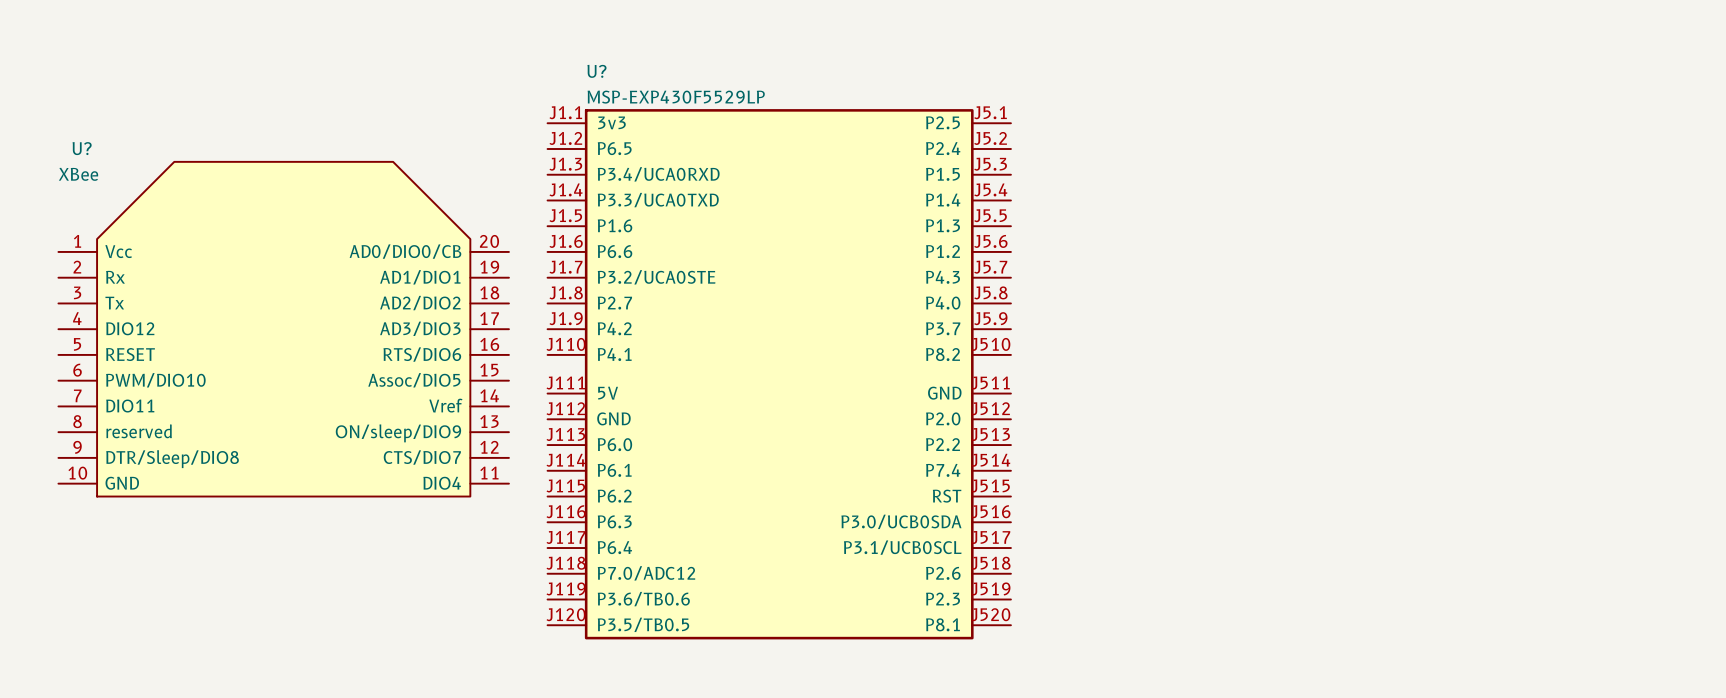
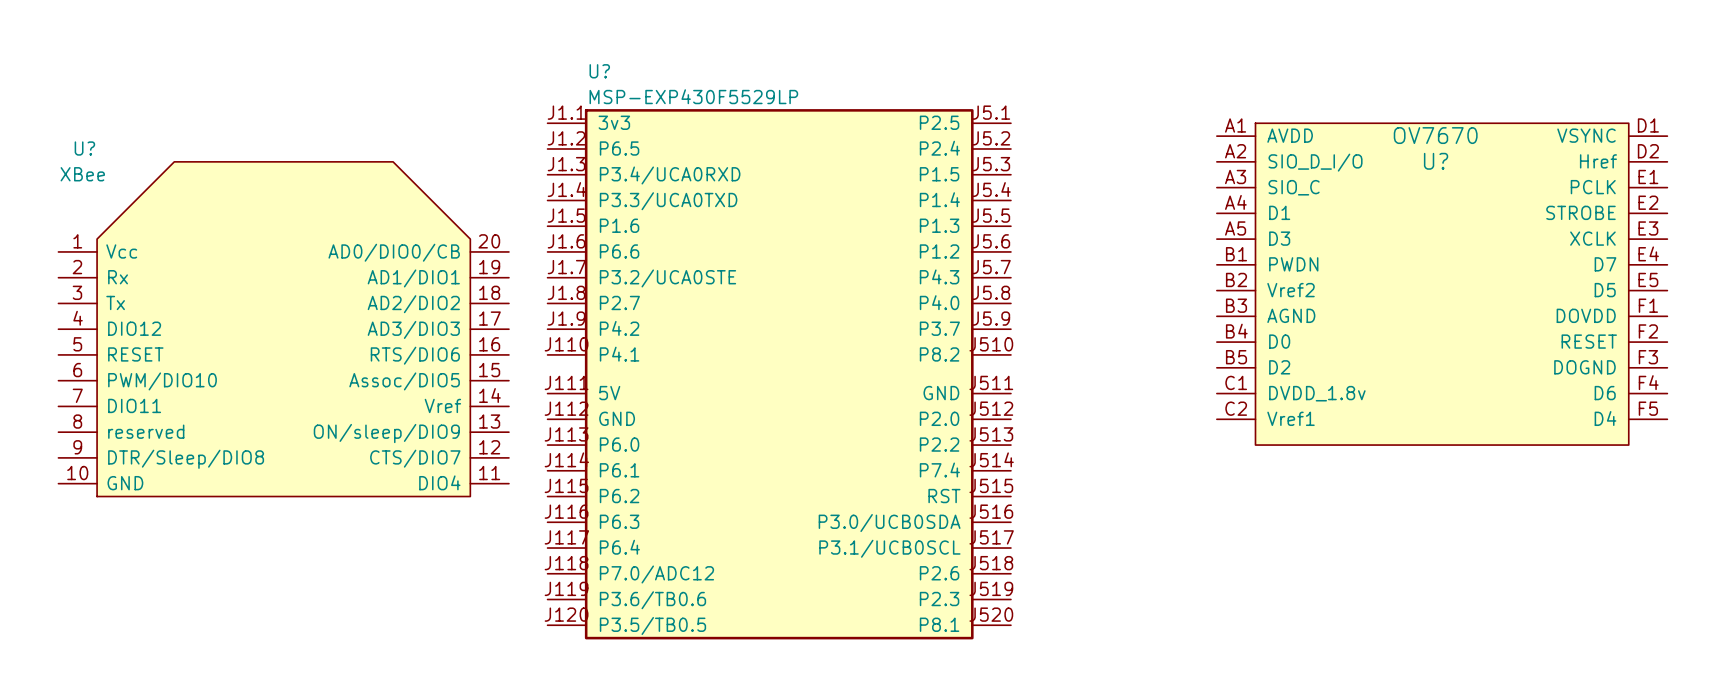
U?: none -> OV7670 (1442, 284)

